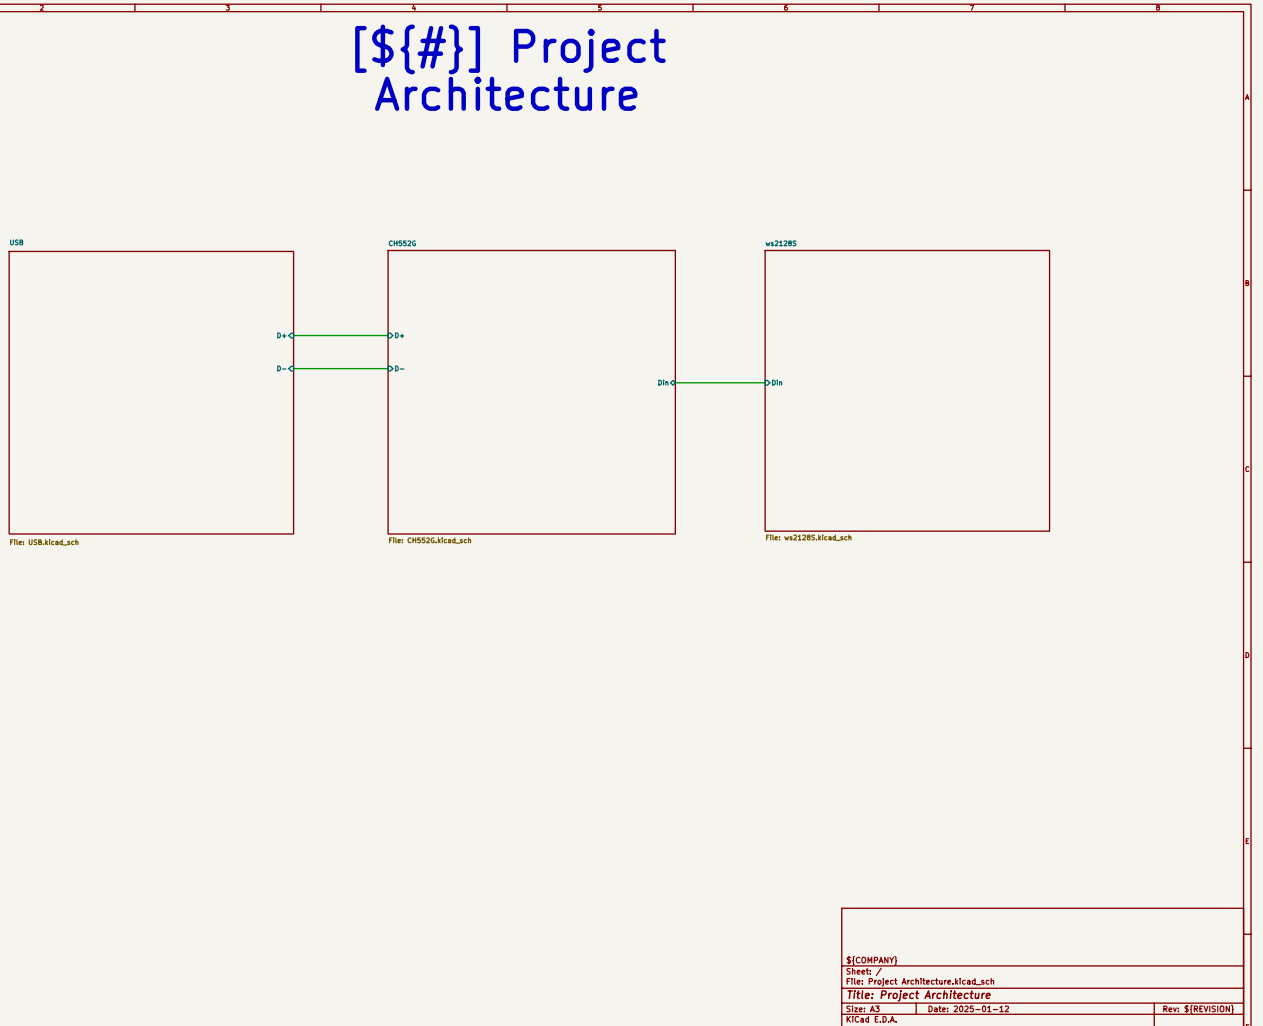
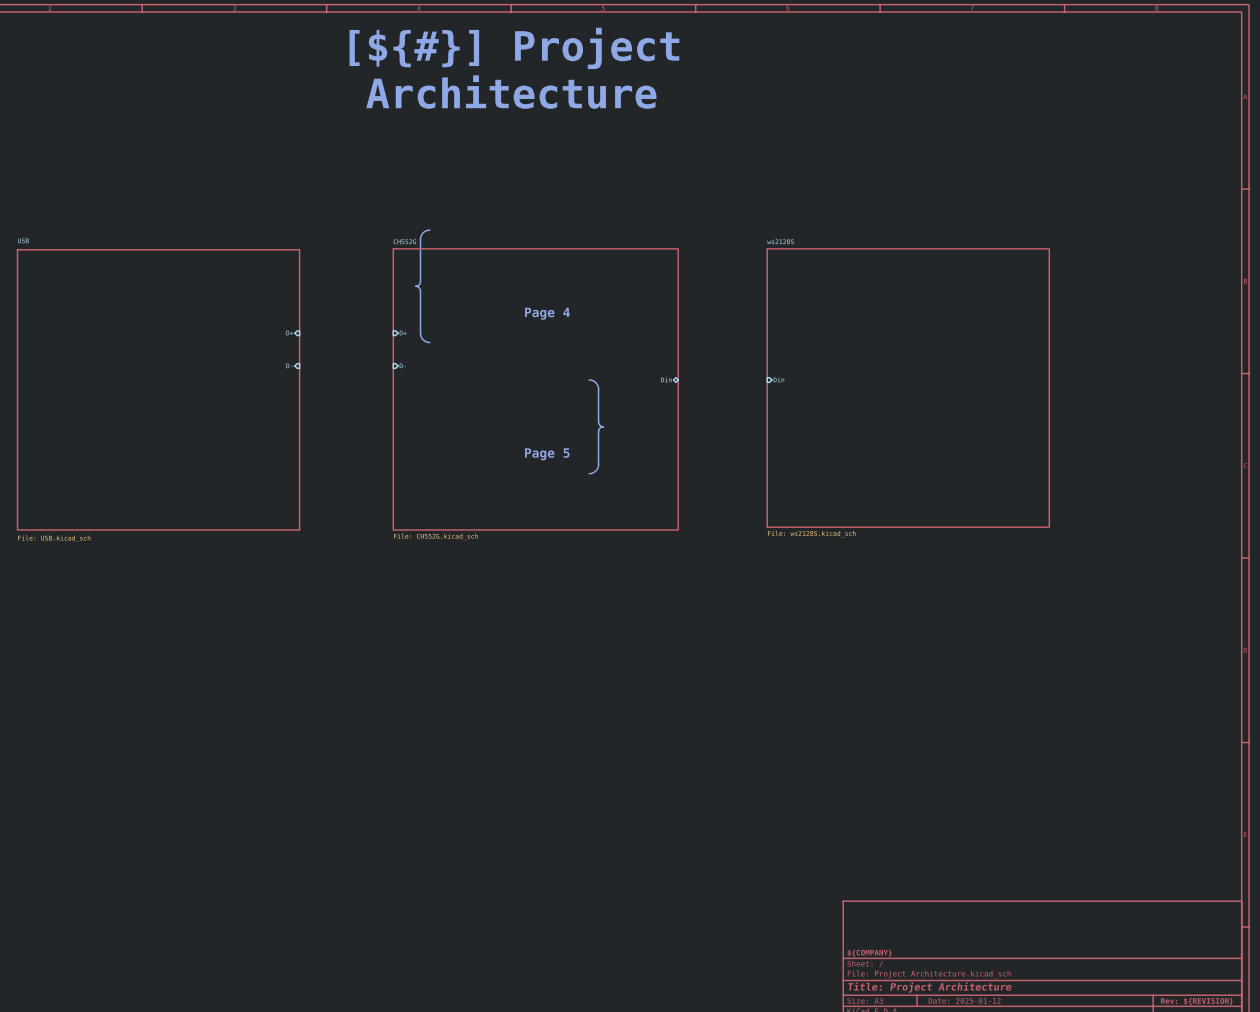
line: none -> (429, 230) (424, 232) (420, 237) (420, 282) (415, 286) (420, 290) (420, 335) (424, 340) (429, 342)
text: none -> Page 4 (547, 313)
wire: (293, 335) (388, 335) -> none
wire: (293, 368) (388, 368) -> none
line: none -> (589, 379) (595, 382) (598, 389)
wire: (675, 382) (765, 382) -> none
line: none -> (598, 389) (598, 422)
line: none -> (598, 422) (603, 426) (598, 431)
line: none -> (598, 431) (598, 464)
text: none -> Page 5 (547, 454)
line: none -> (598, 464) (595, 470) (589, 473)

